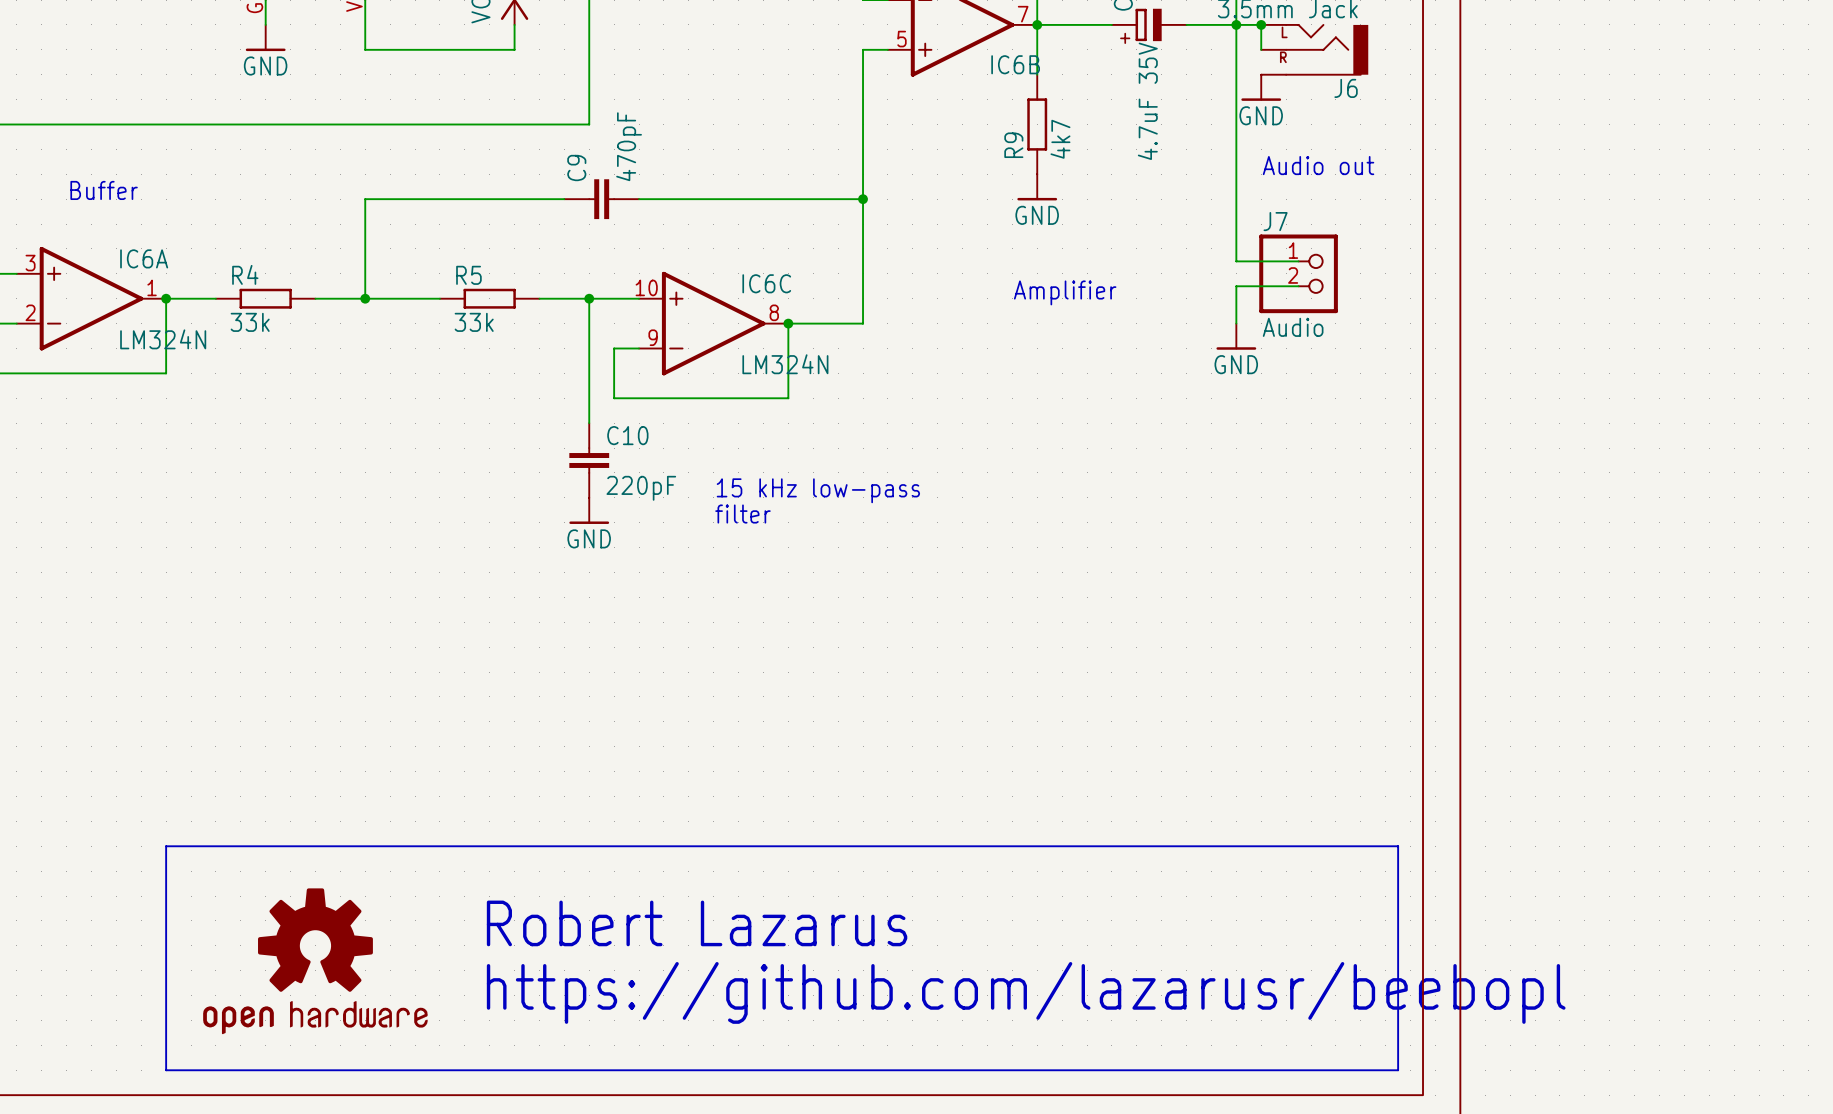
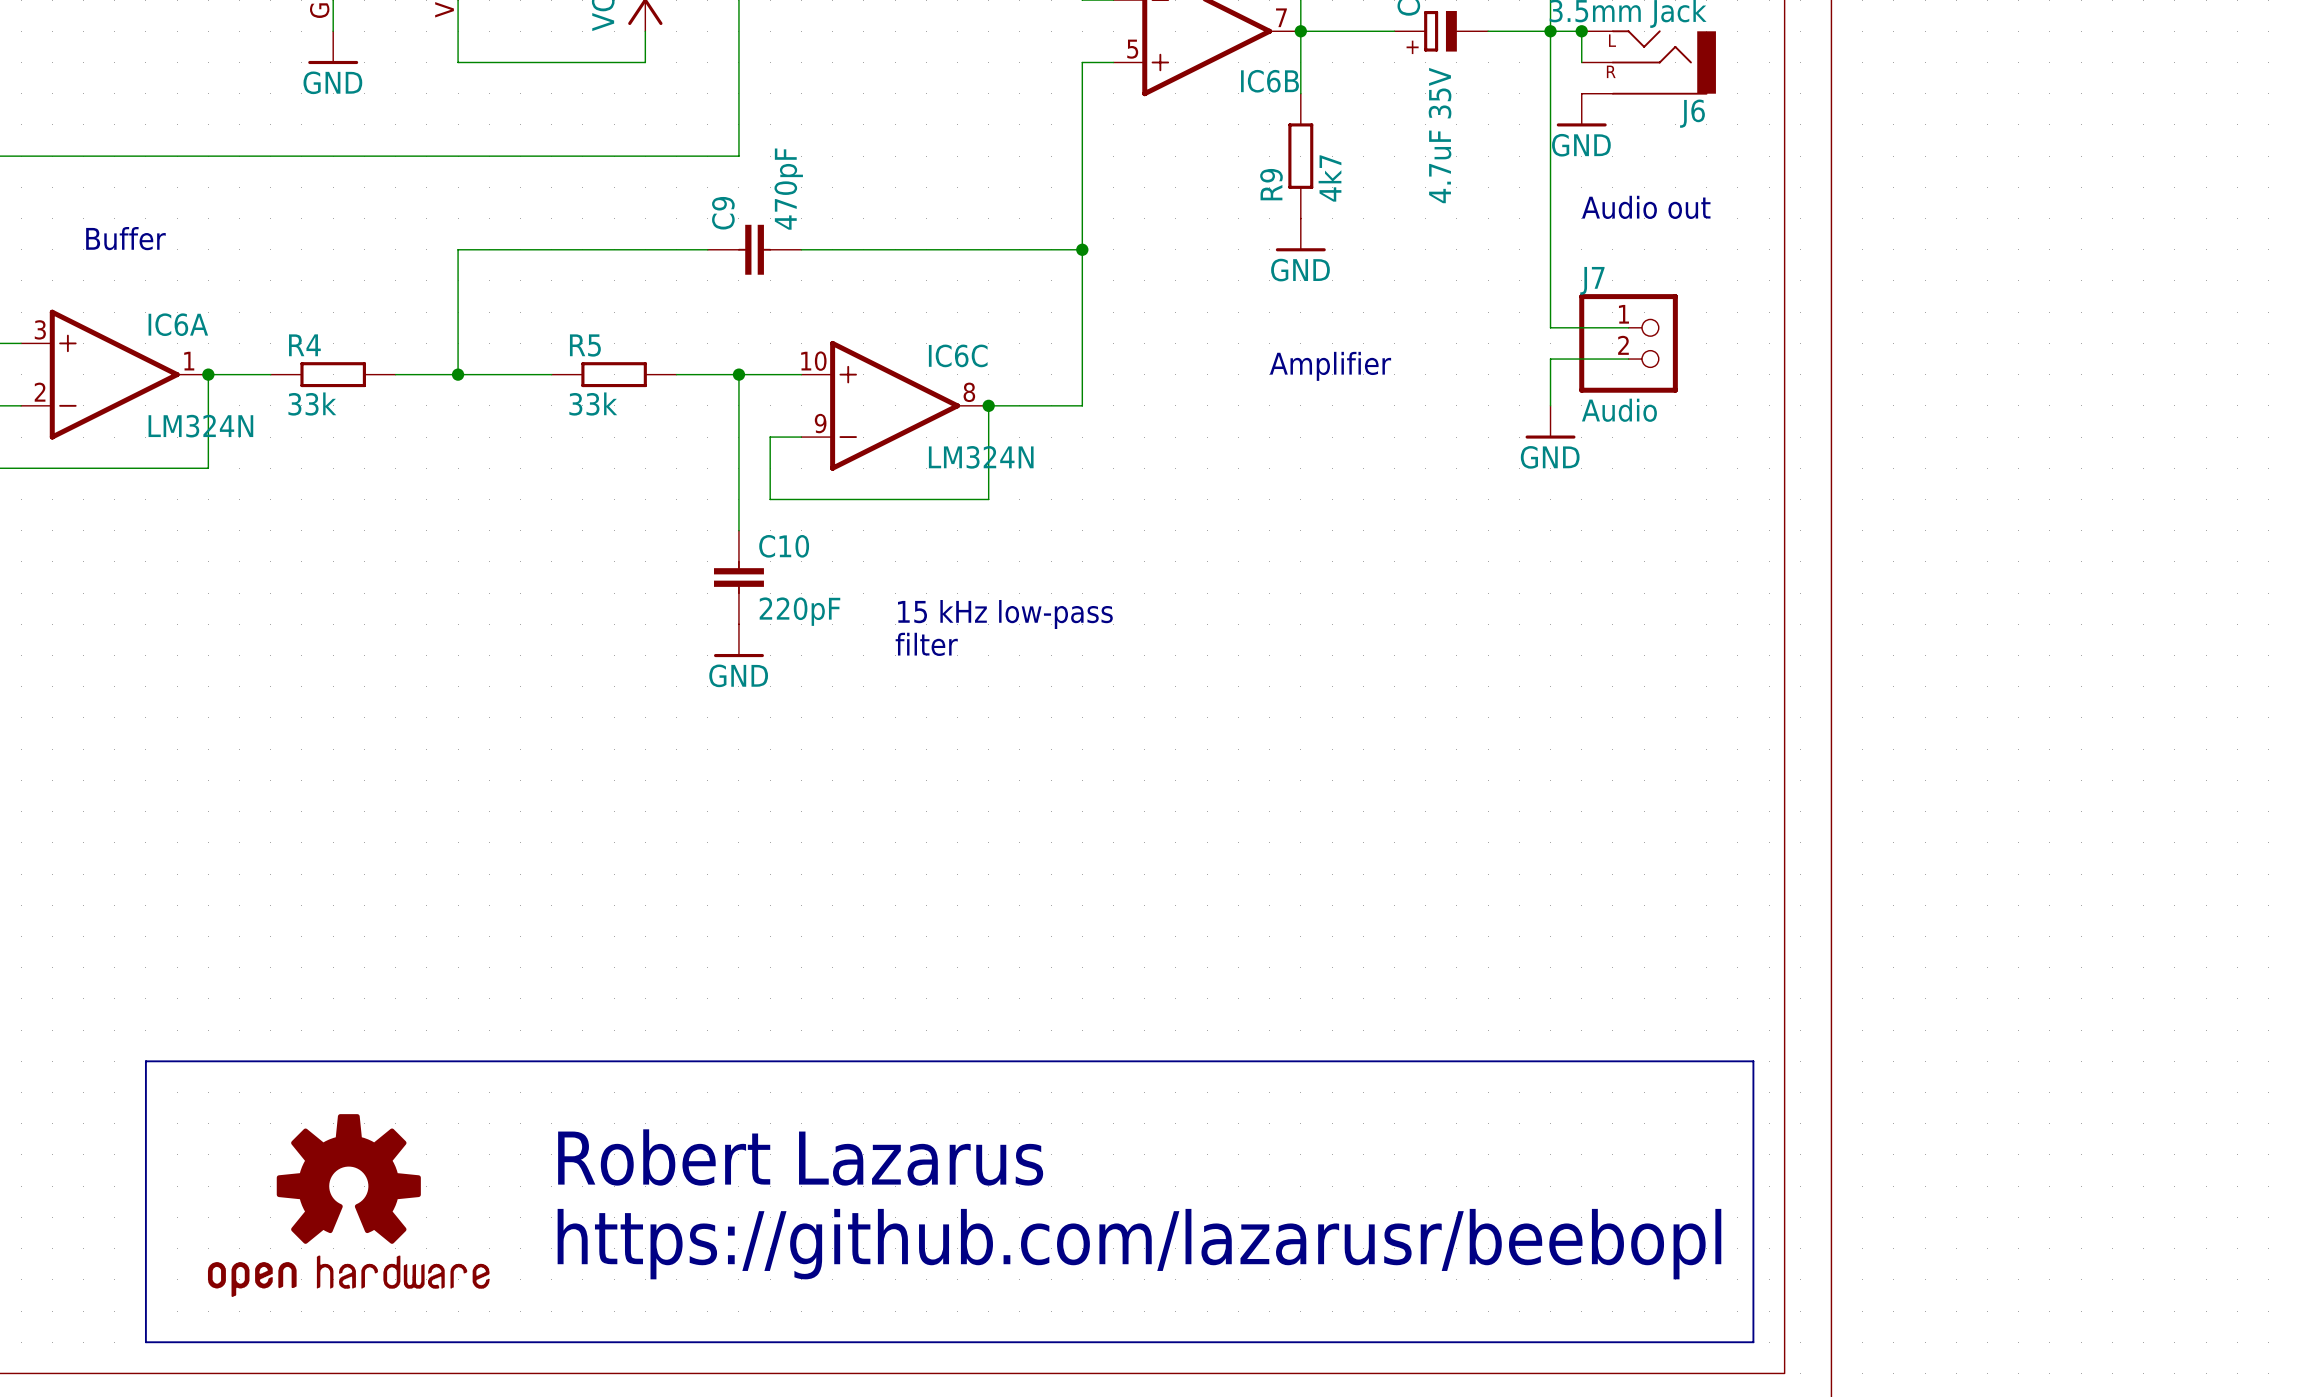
line: (166, 846) (166, 1070) -> (208, 1061) (145, 1061) (145, 1342) (208, 1342)
text position: Robert Lazarus (697, 923) -> Robert Lazarus (800, 1157)
part position: (315, 961) -> (348, 1205)
text position: https://github.com/lazarusr/beebopl (1026, 992) -> https://github.com/lazarusr/beebopl (1139, 1244)

